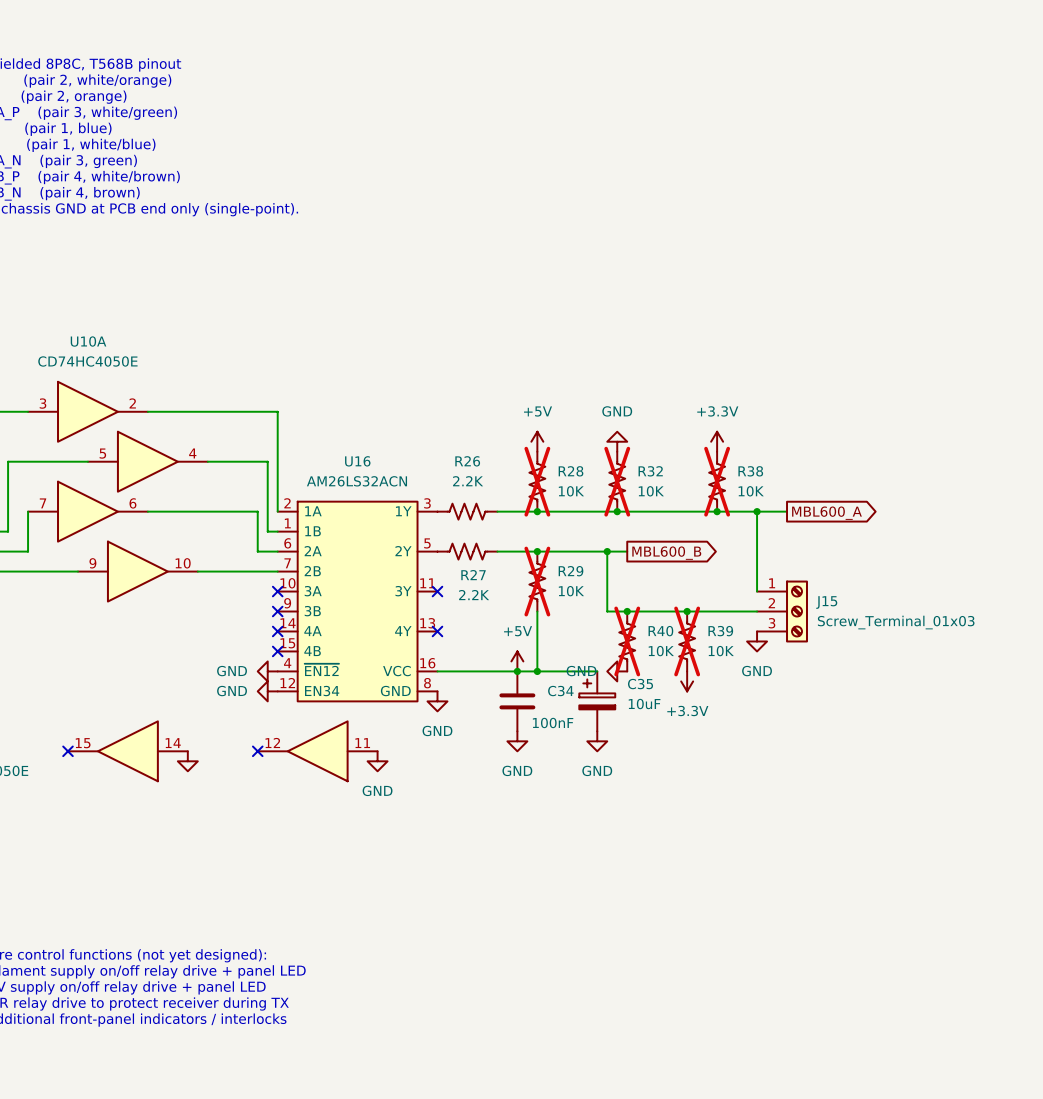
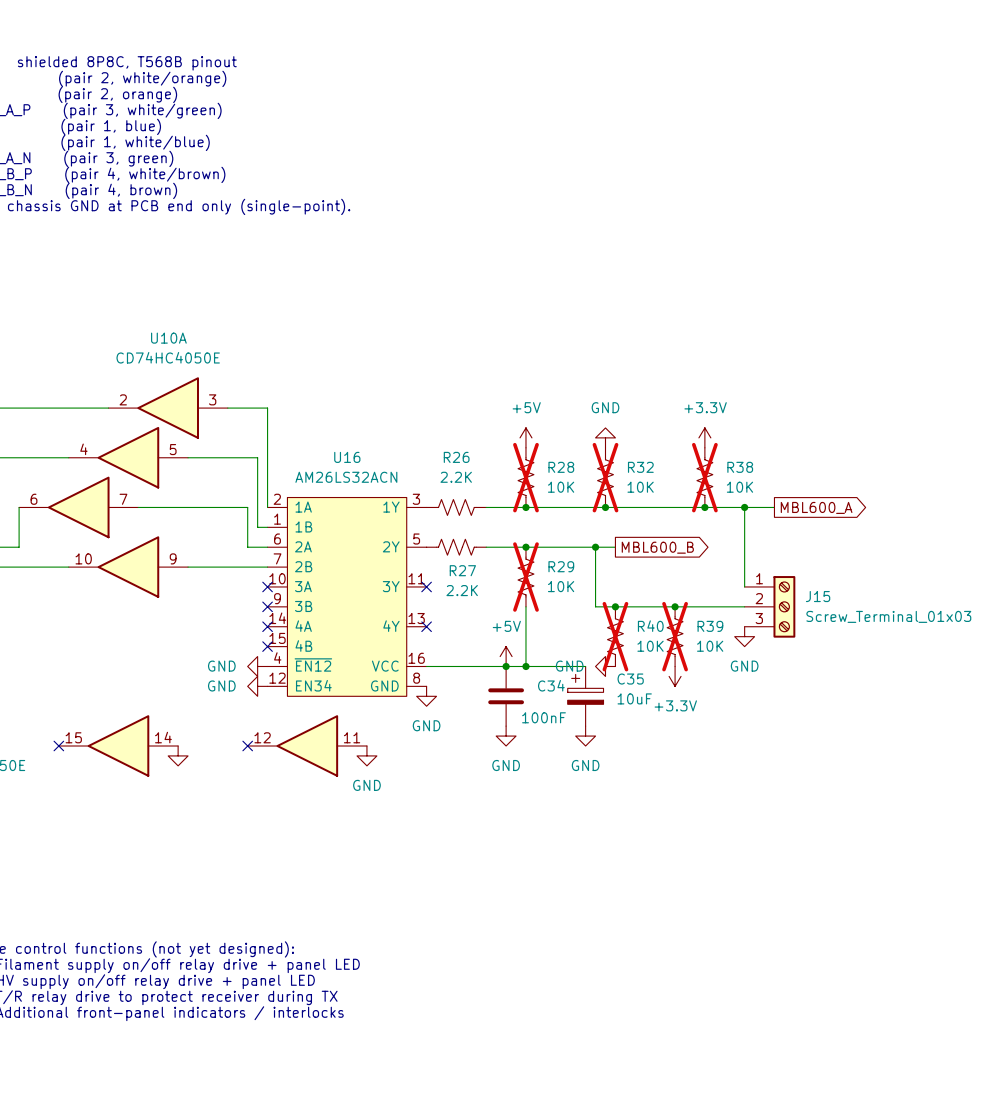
U10A rotation: 0° (87, 411) -> 180° (168, 408)
U10A position: (87, 411) -> (168, 408)
part rotation: 0° (147, 461) -> 180° (128, 457)
part rotation: 0° (87, 511) -> 180° (78, 507)
part rotation: 0° (137, 571) -> 180° (128, 567)

